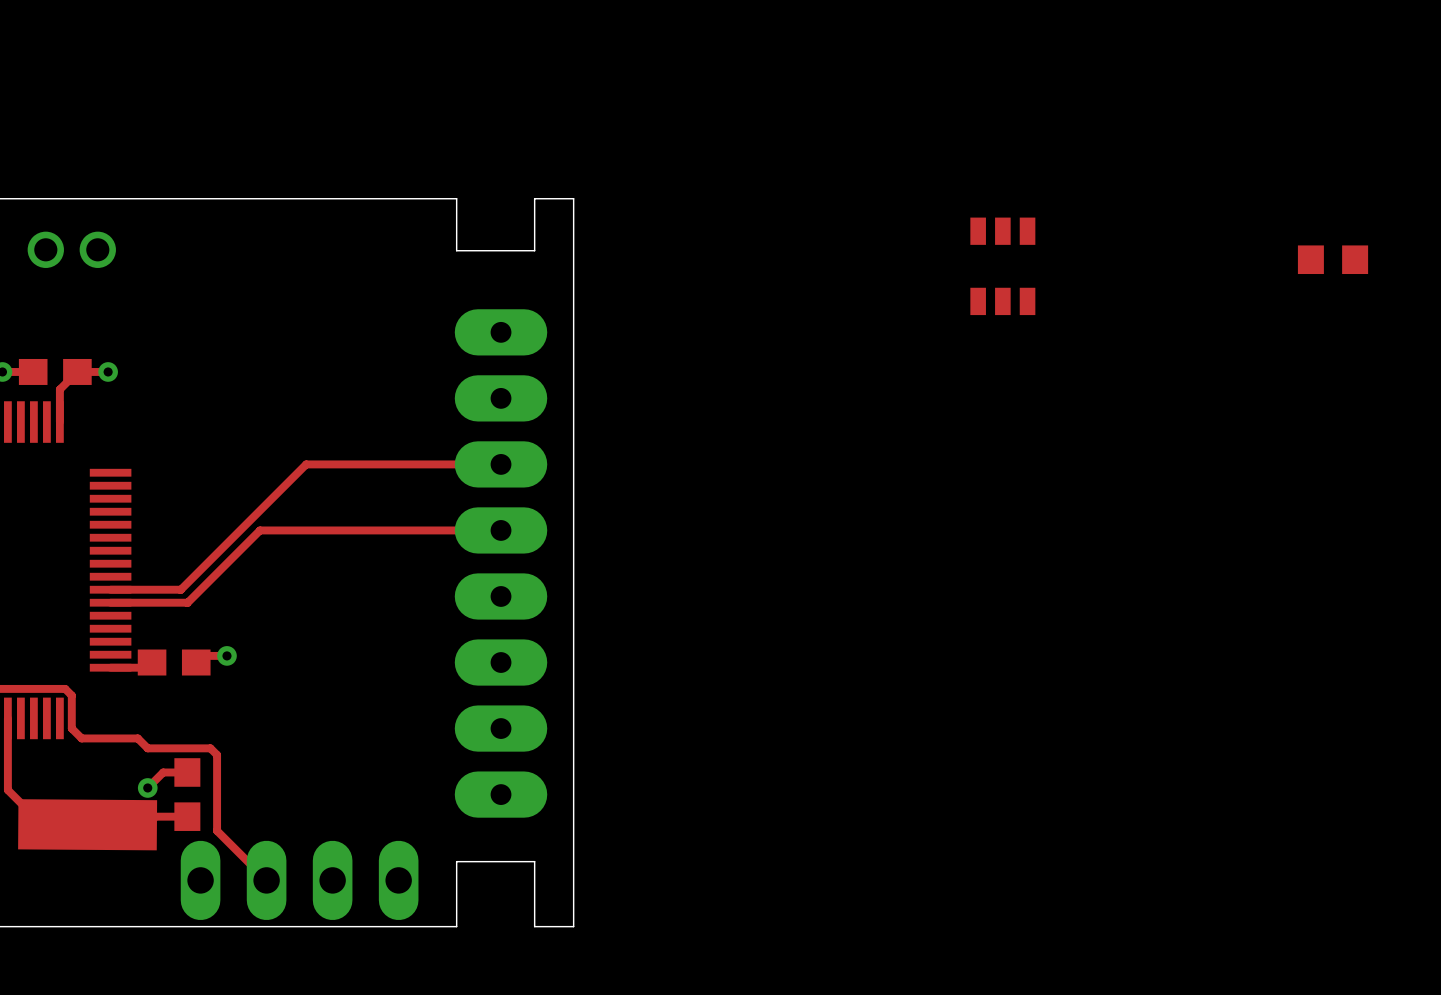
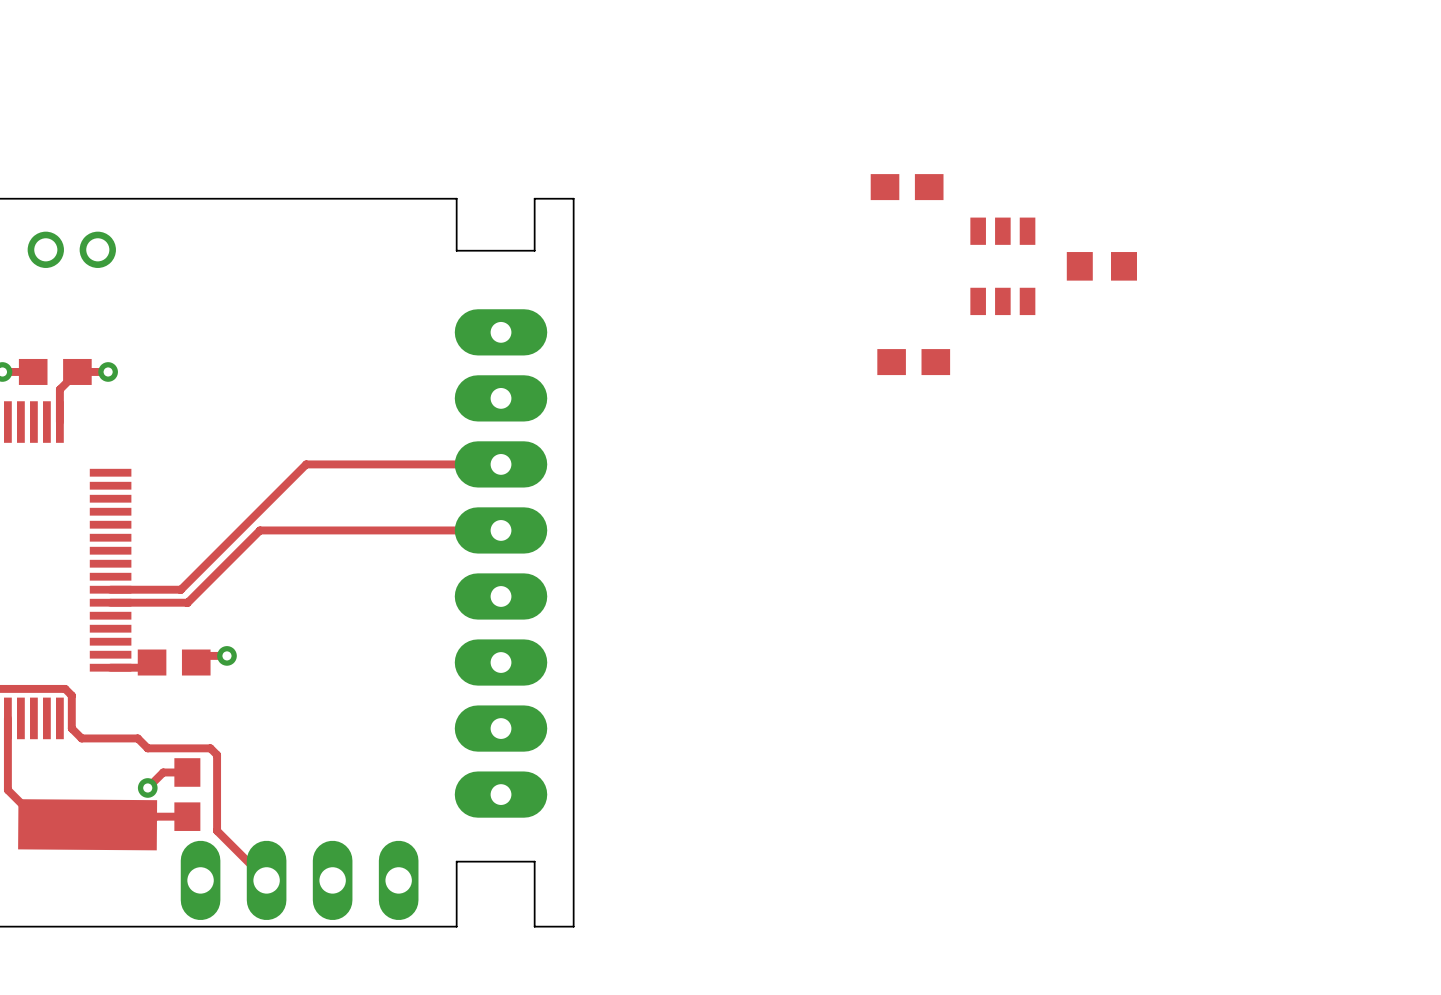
part: none -> (907, 187)
part position: (1333, 259) -> (1101, 266)
part: none -> (913, 362)

